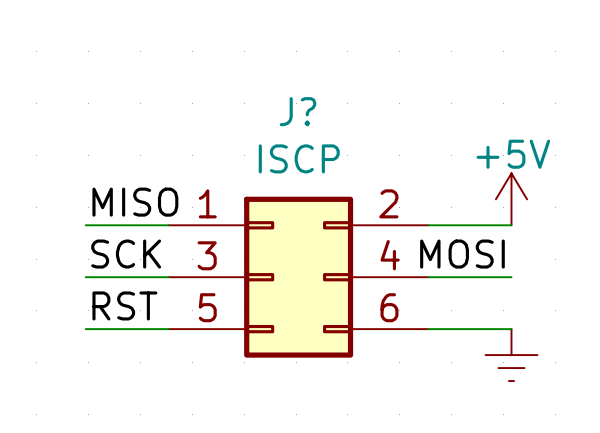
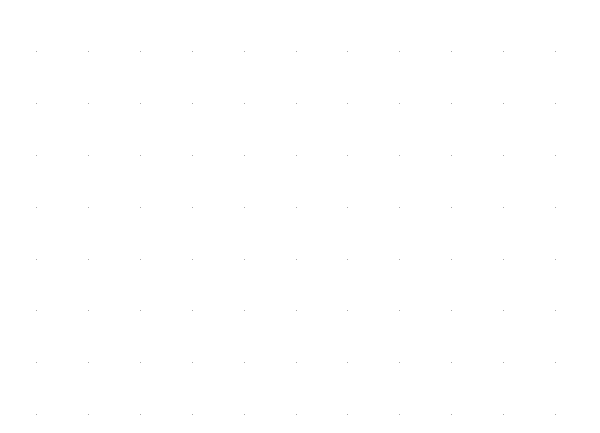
power symbol: +5V (511, 199) -> none
label: MISO (135, 202) -> none
wire: (85, 225) (168, 225) -> none
wire: (428, 225) (511, 225) -> none
label: SCK (126, 254) -> none
label: MOSI (462, 254) -> none
wire: (85, 277) (168, 277) -> none
J?: ISCP (298, 277) -> none
wire: (428, 277) (511, 277) -> none
label: RST (124, 305) -> none
wire: (85, 329) (168, 329) -> none
wire: (428, 329) (511, 329) -> none
power symbol: (511, 355) -> none

